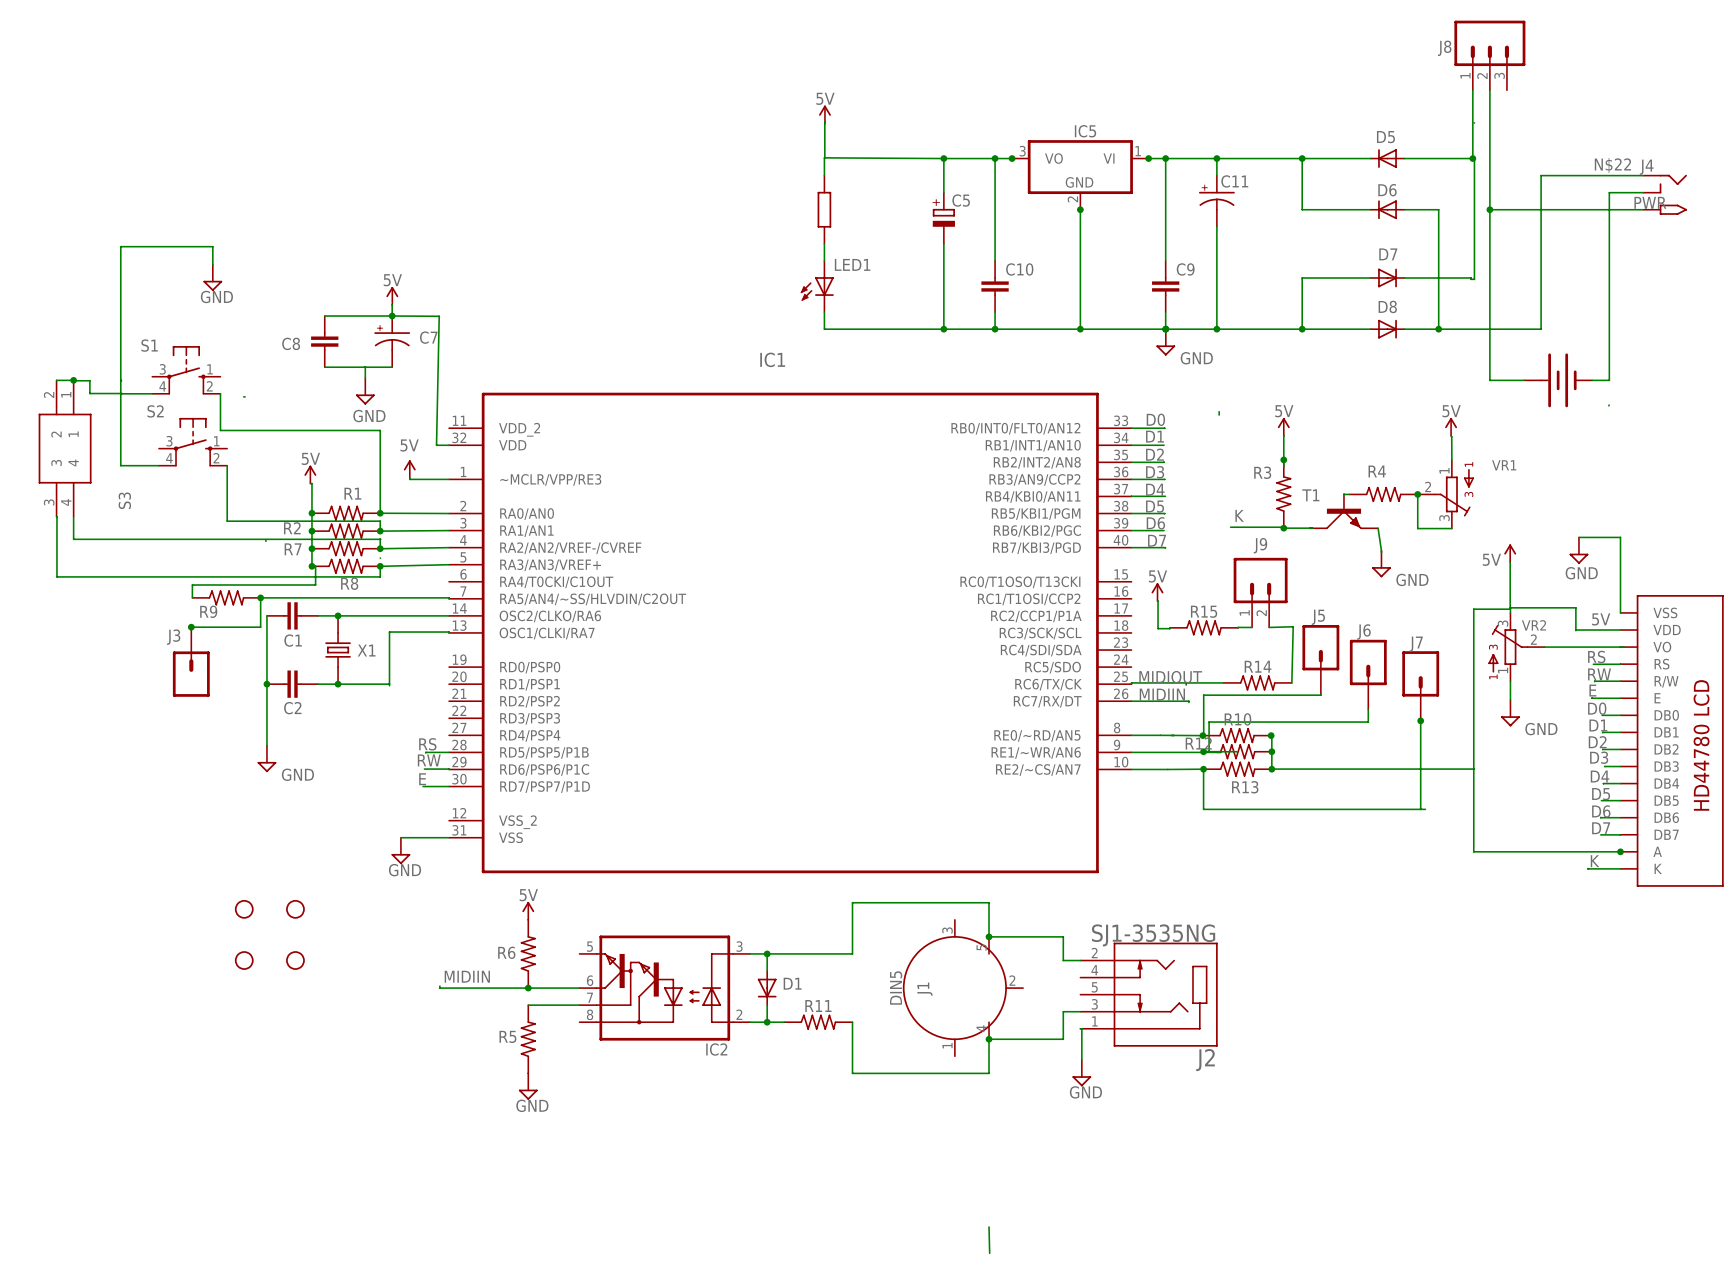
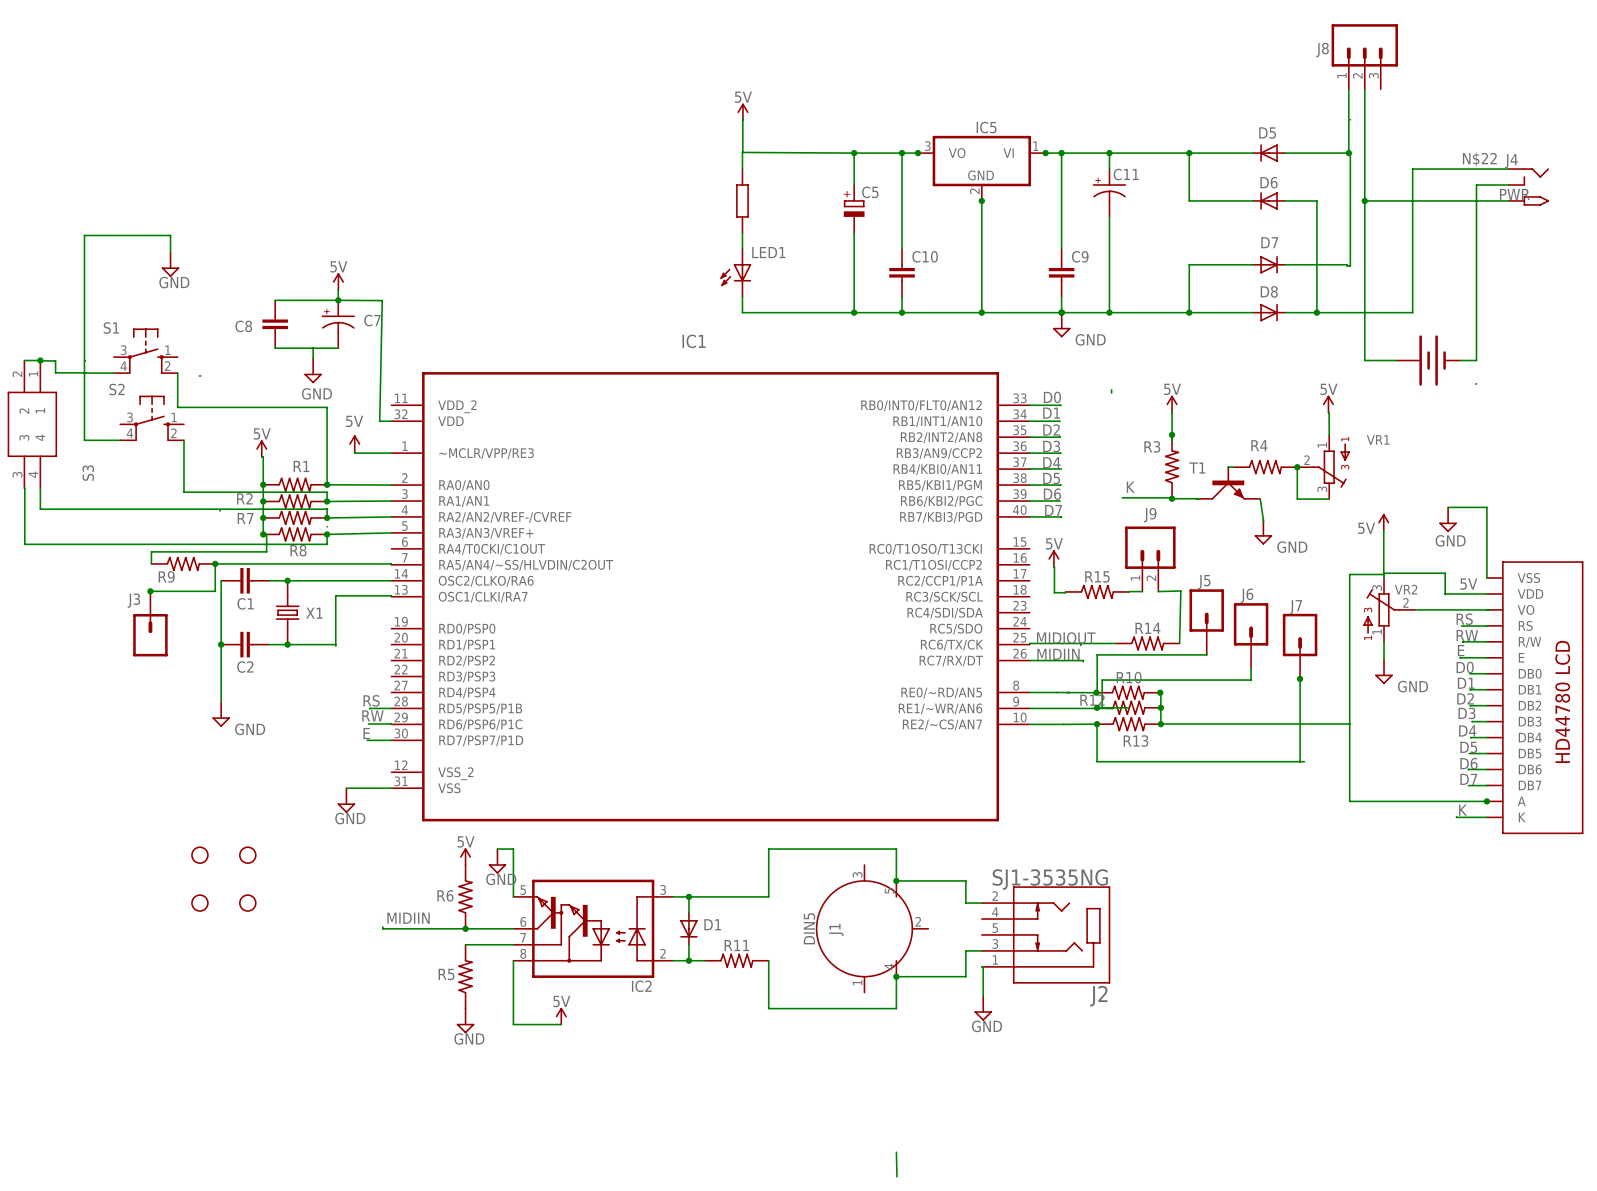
wire: none -> (497, 849) (513, 849) (513, 896)
power symbol: none -> GND (497, 861)
wire: none -> (513, 960) (513, 1024) (561, 1024)
power symbol: none -> 5V (561, 1016)

